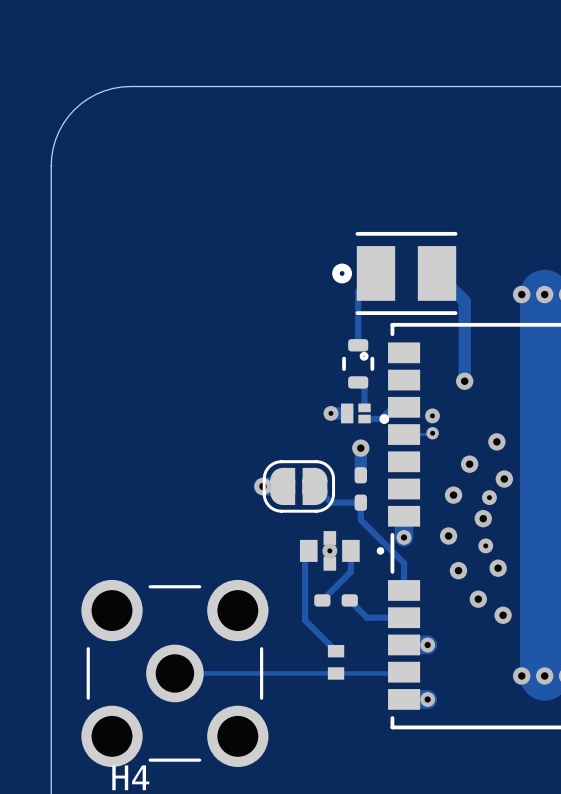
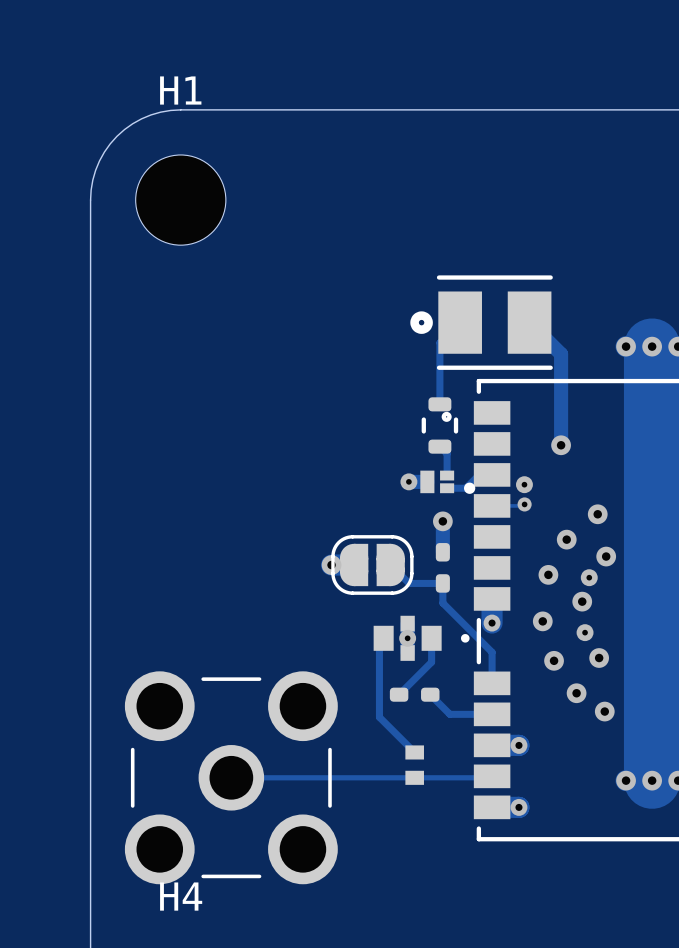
H1: none -> (180, 200)

